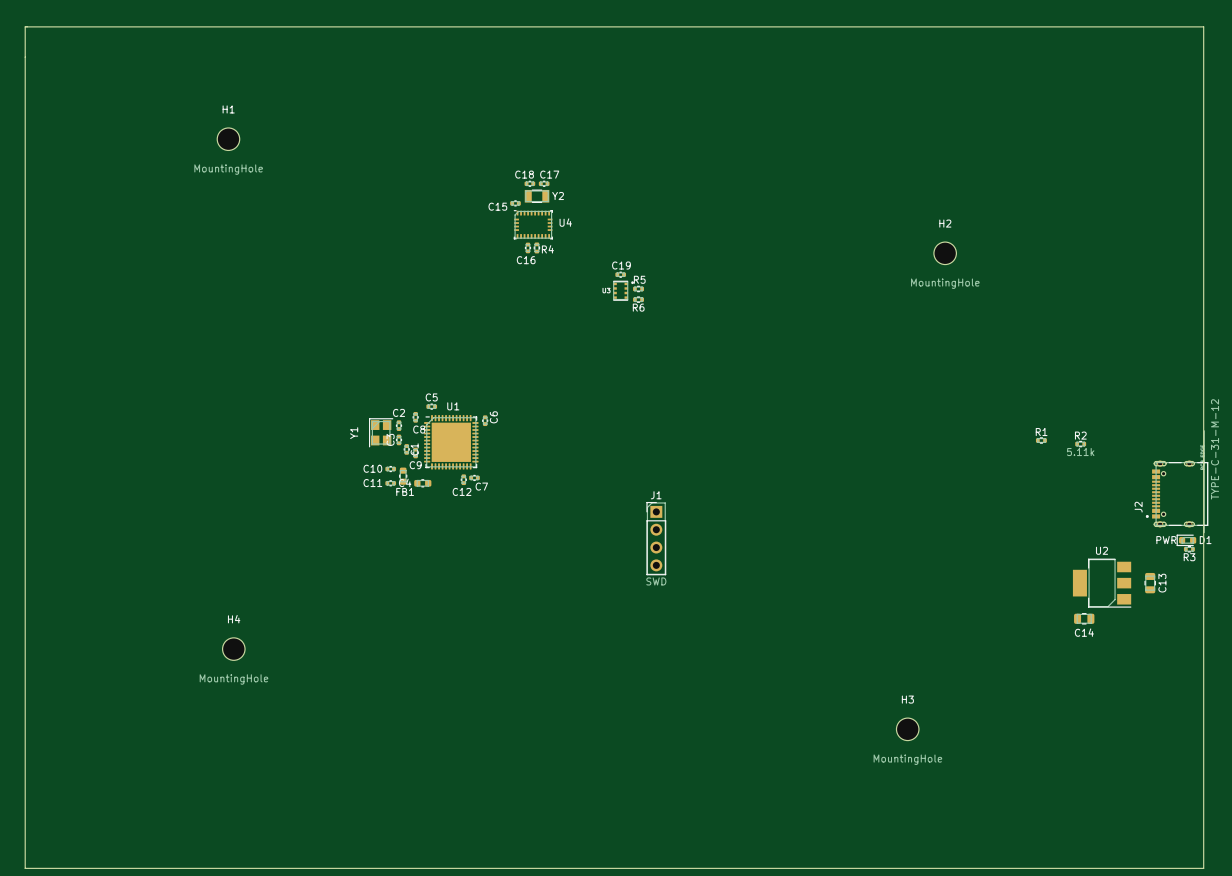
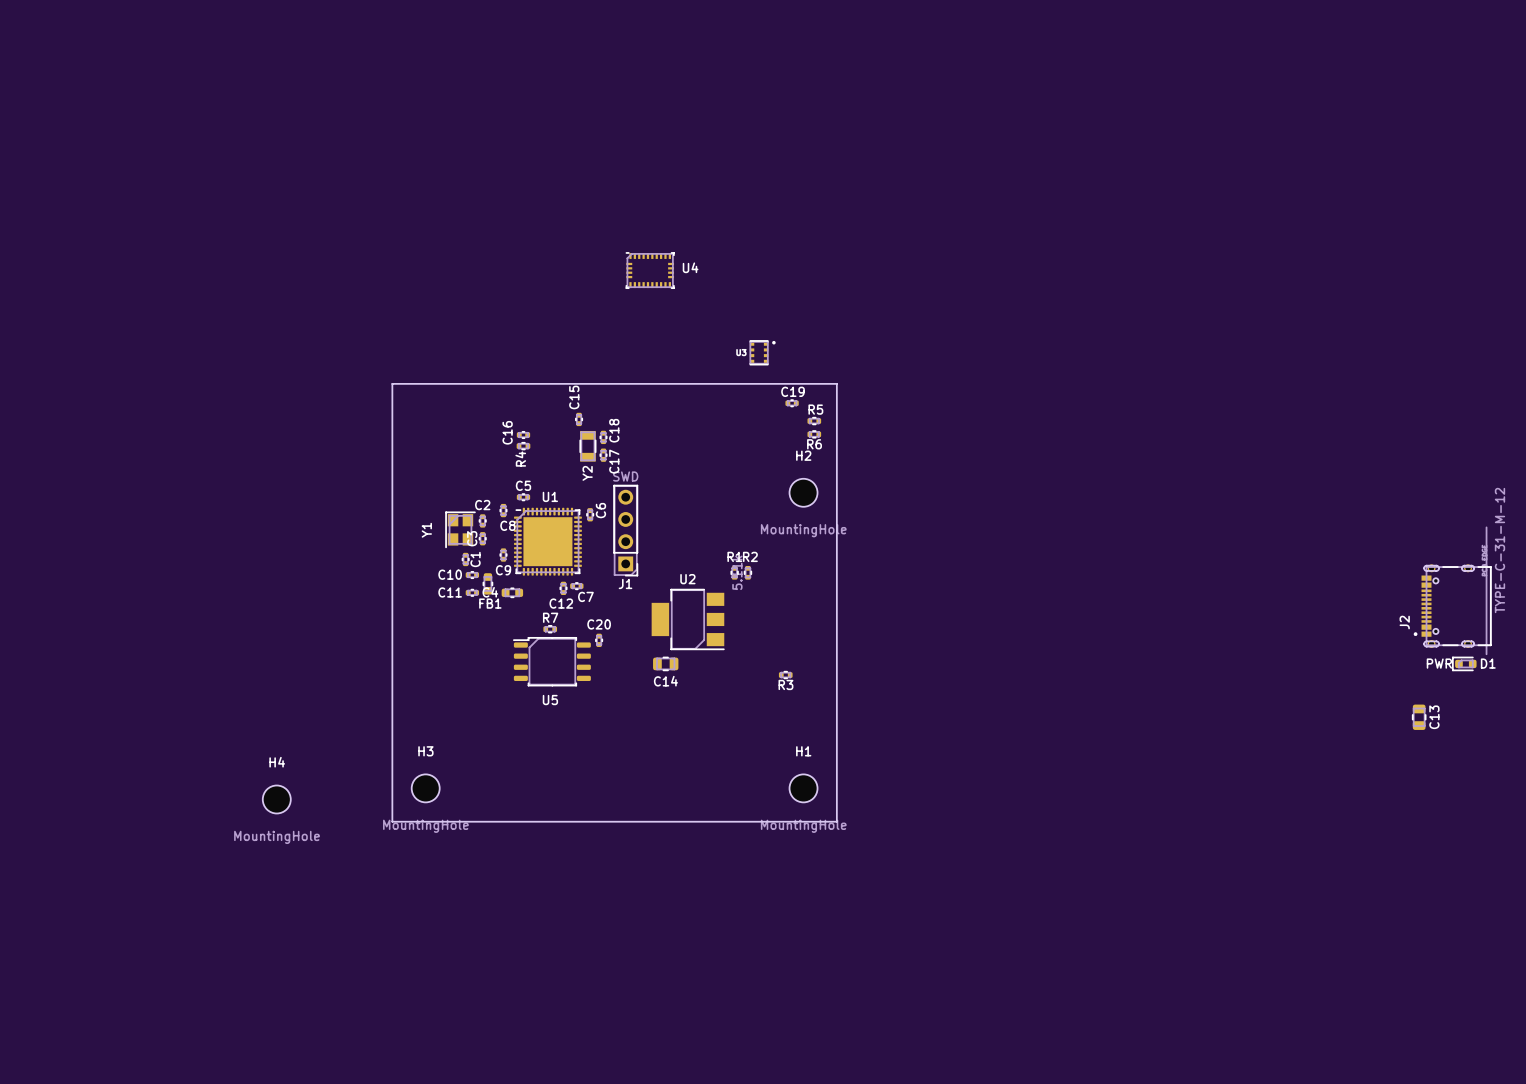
board edge: (25, 26) (1203, 26) (1203, 868) (25, 868) (25, 26) -> none
H1 position: (228, 139) -> (803, 788)
C18 rotation: 0° (529, 183) -> 90° clockwise (603, 437)
C18 position: (529, 183) -> (603, 437)
C17 rotation: 0° (544, 183) -> 90° clockwise (603, 455)
C17 position: (544, 183) -> (603, 455)
Y2 rotation: 0° (537, 196) -> 90° clockwise (587, 446)
Y2 position: (537, 196) -> (587, 446)
C15 rotation: 0° (515, 203) -> 90° clockwise (579, 419)
C15 position: (515, 203) -> (579, 419)
C16 rotation: 0° (527, 247) -> 90° clockwise (523, 435)
C16 position: (527, 247) -> (523, 435)
R4 rotation: 0° (536, 247) -> 90° clockwise (523, 446)
R4 position: (536, 247) -> (523, 446)
H2 position: (945, 253) -> (803, 492)
C19 position: (620, 274) -> (792, 403)
R5 position: (638, 288) -> (814, 421)
R6 position: (638, 299) -> (814, 434)
board edge: none -> (392, 383) (836, 383) (836, 821) (392, 821) (392, 383)
R1 rotation: 0° (1041, 440) -> 90° clockwise (734, 572)
R1 position: (1041, 440) -> (734, 572)
R2 rotation: 0° (1080, 444) -> 90° clockwise (747, 572)
R2 position: (1080, 444) -> (747, 572)
C1 position: (406, 449) -> (465, 559)
R7: none -> (550, 629)
C20: none -> (599, 640)
U5: none -> (552, 661)
J1 rotation: 0° (656, 538) -> 180° (625, 530)
J1 position: (656, 538) -> (625, 530)
R3 position: (1189, 549) -> (785, 675)
U2 position: (1102, 583) -> (688, 619)
C14 position: (1084, 618) -> (665, 663)
H3 position: (907, 729) -> (425, 788)

